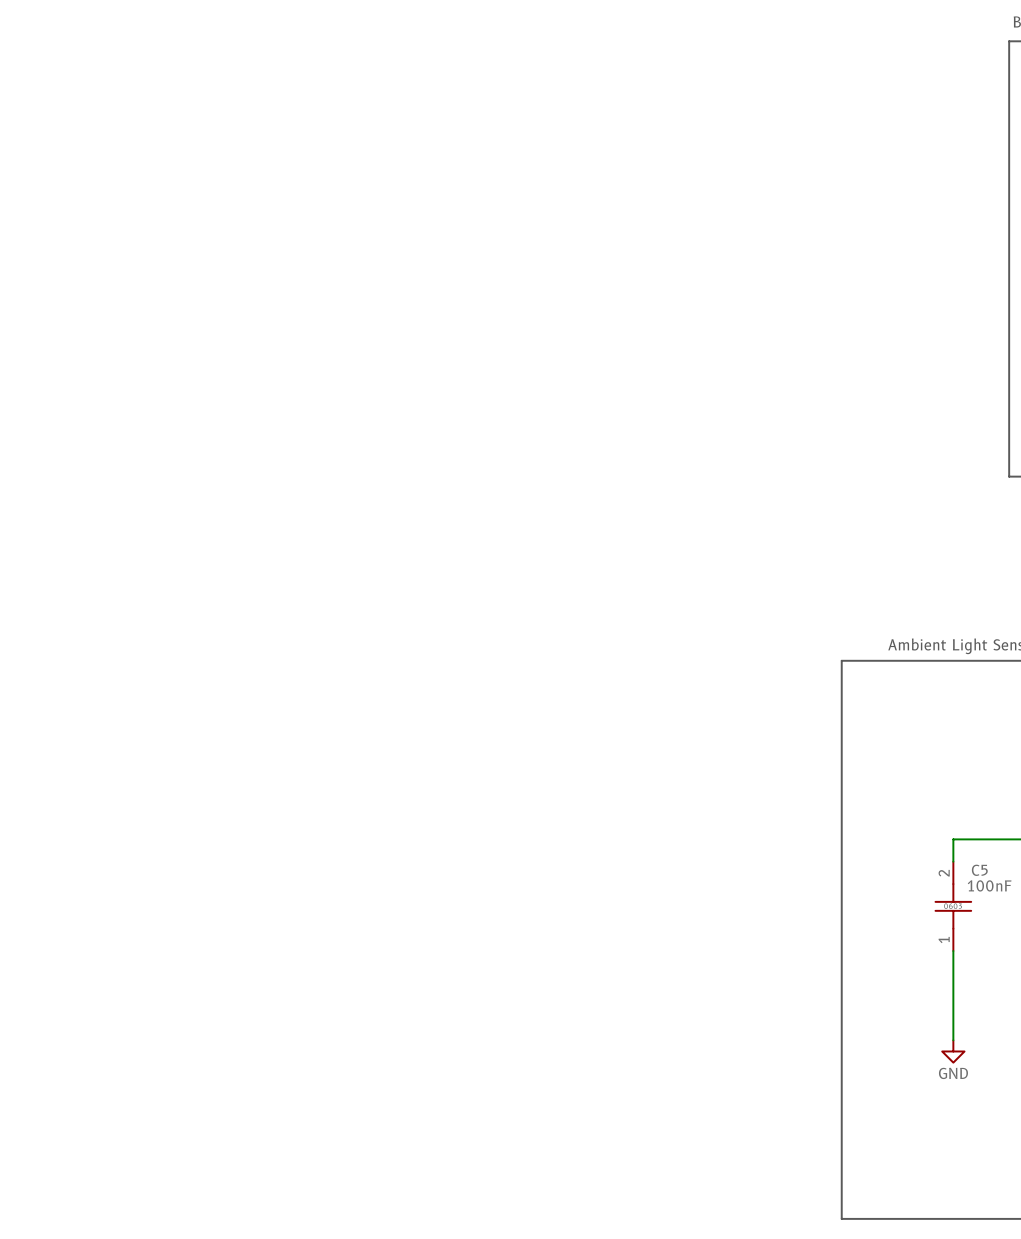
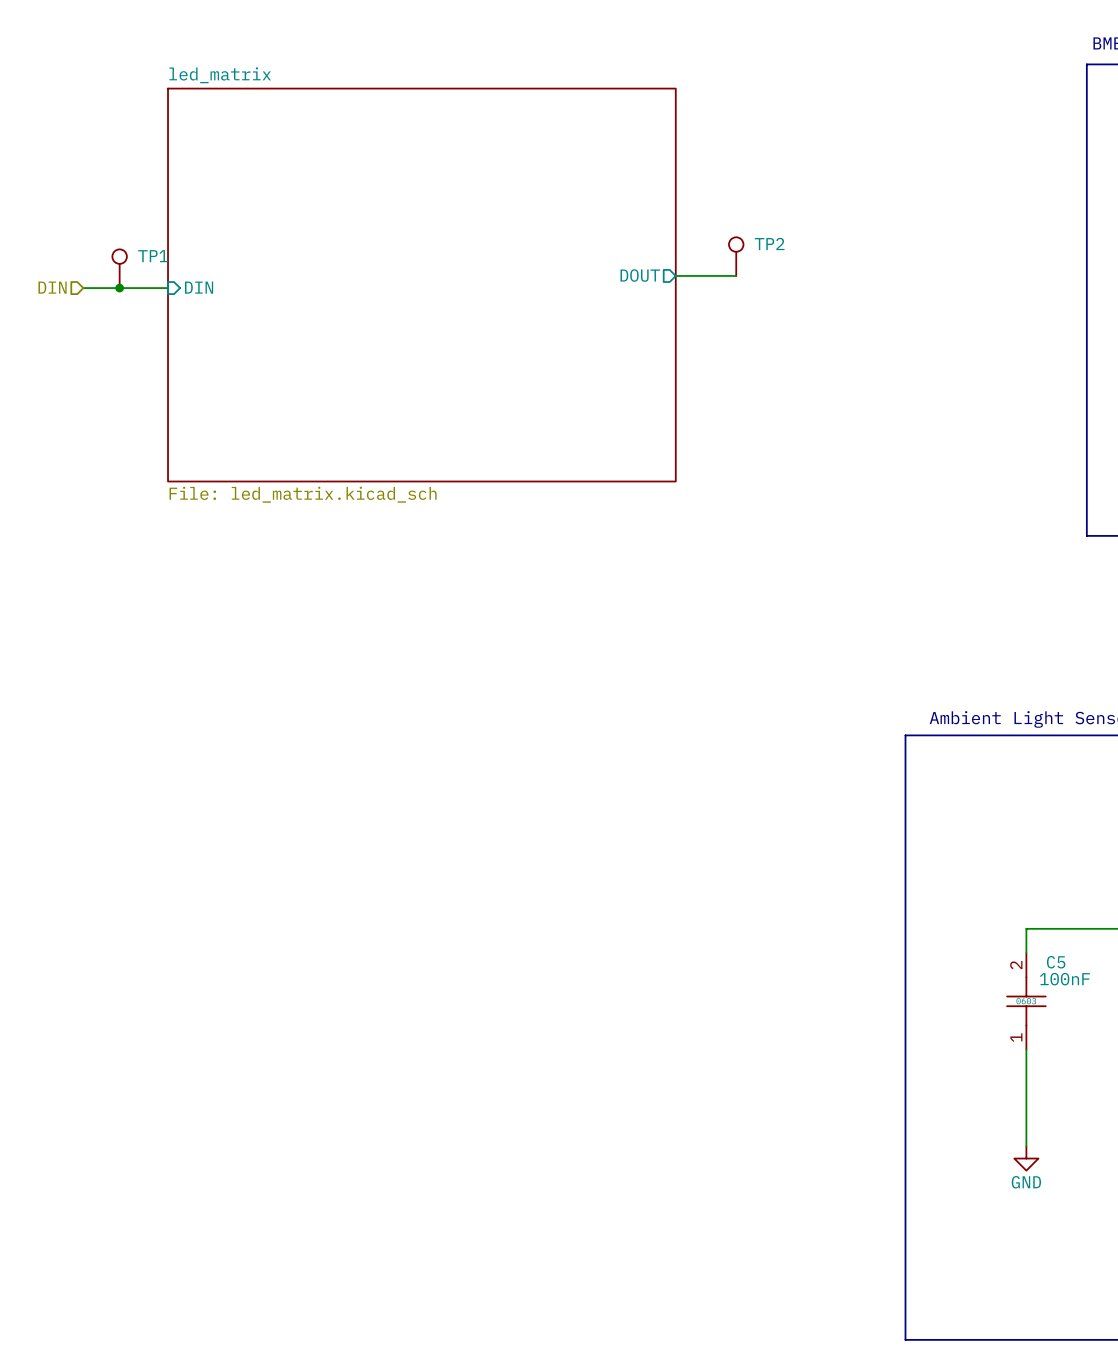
TP2: none -> (736, 256)
TP1: none -> (119, 268)
sheet pin: none -> DOUT (640, 275)
wire: none -> (675, 275) (736, 275)
sheet led_matrix: none -> File: led_matrix.kicad_sch (421, 285)
hierarchical label: none -> DIN (52, 287)
wire: none -> (83, 288) (168, 288)
junction: none -> (119, 288)
sheet pin: none -> DIN (199, 287)

